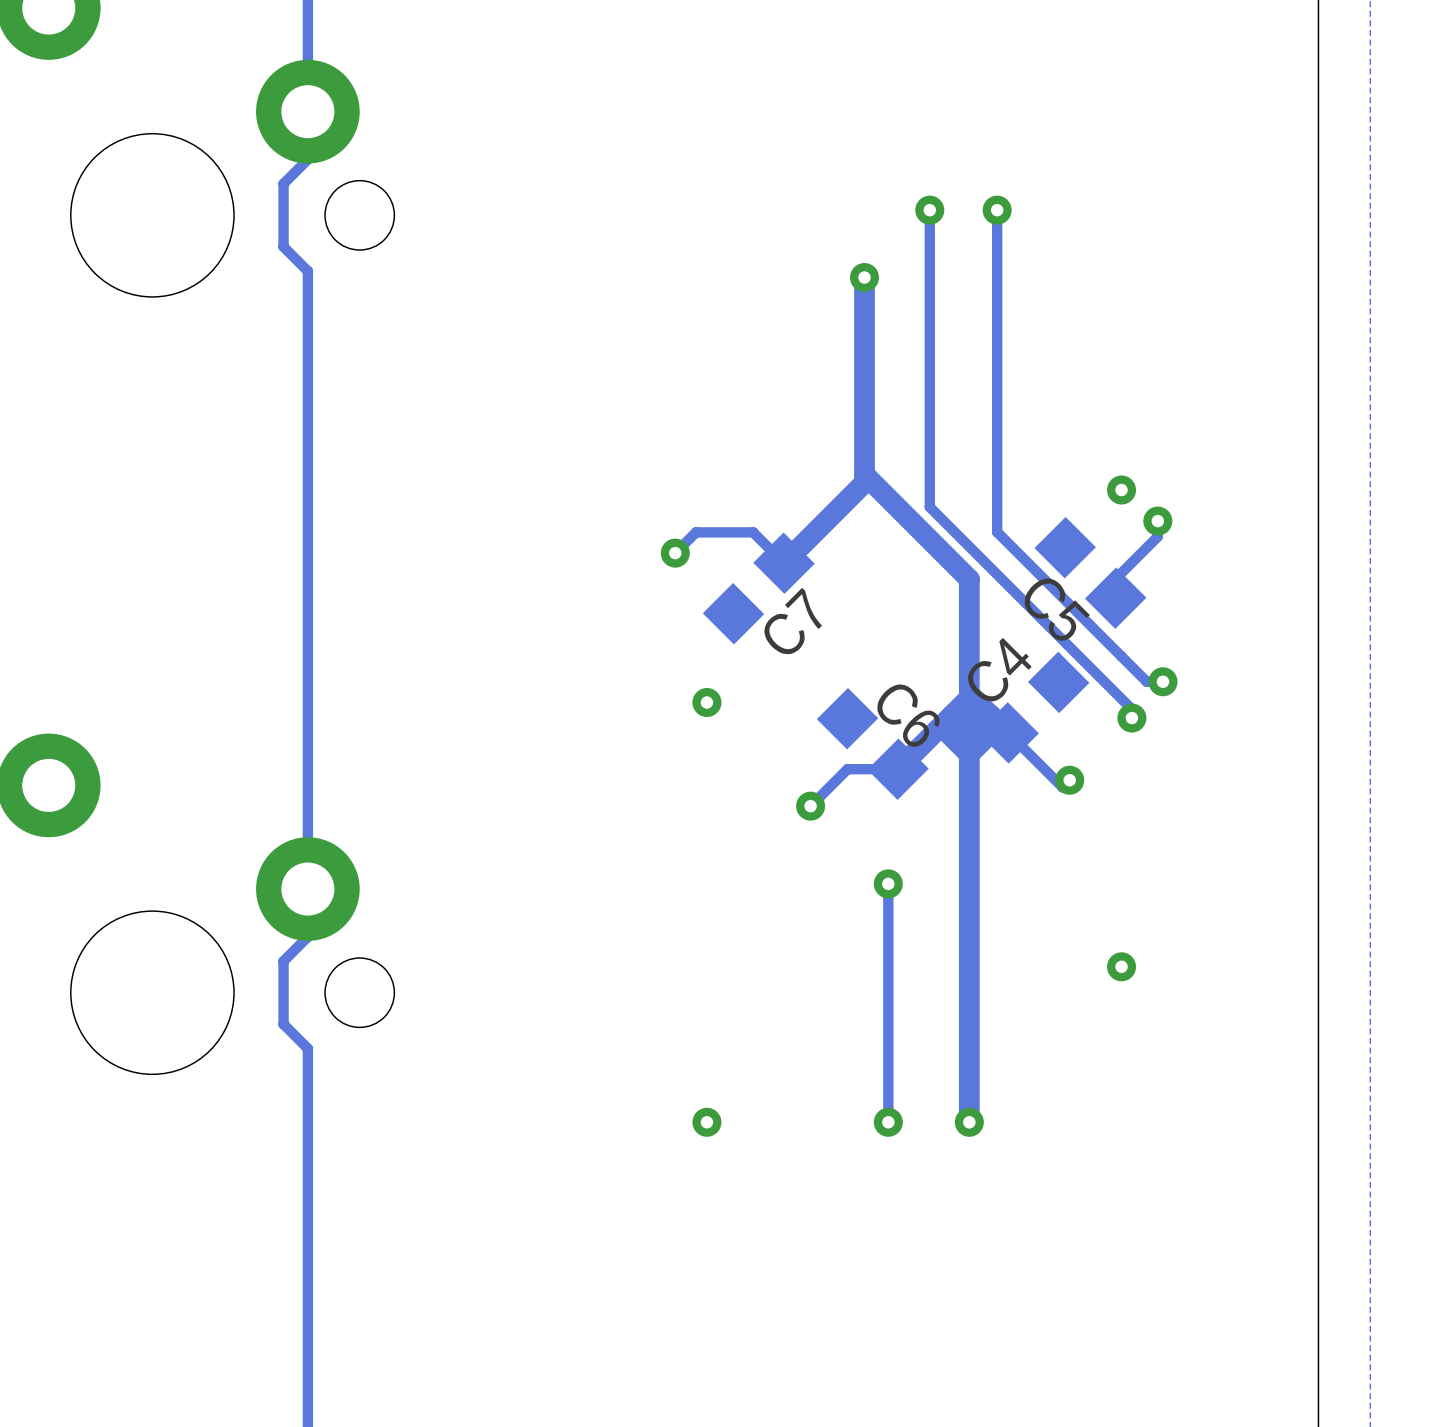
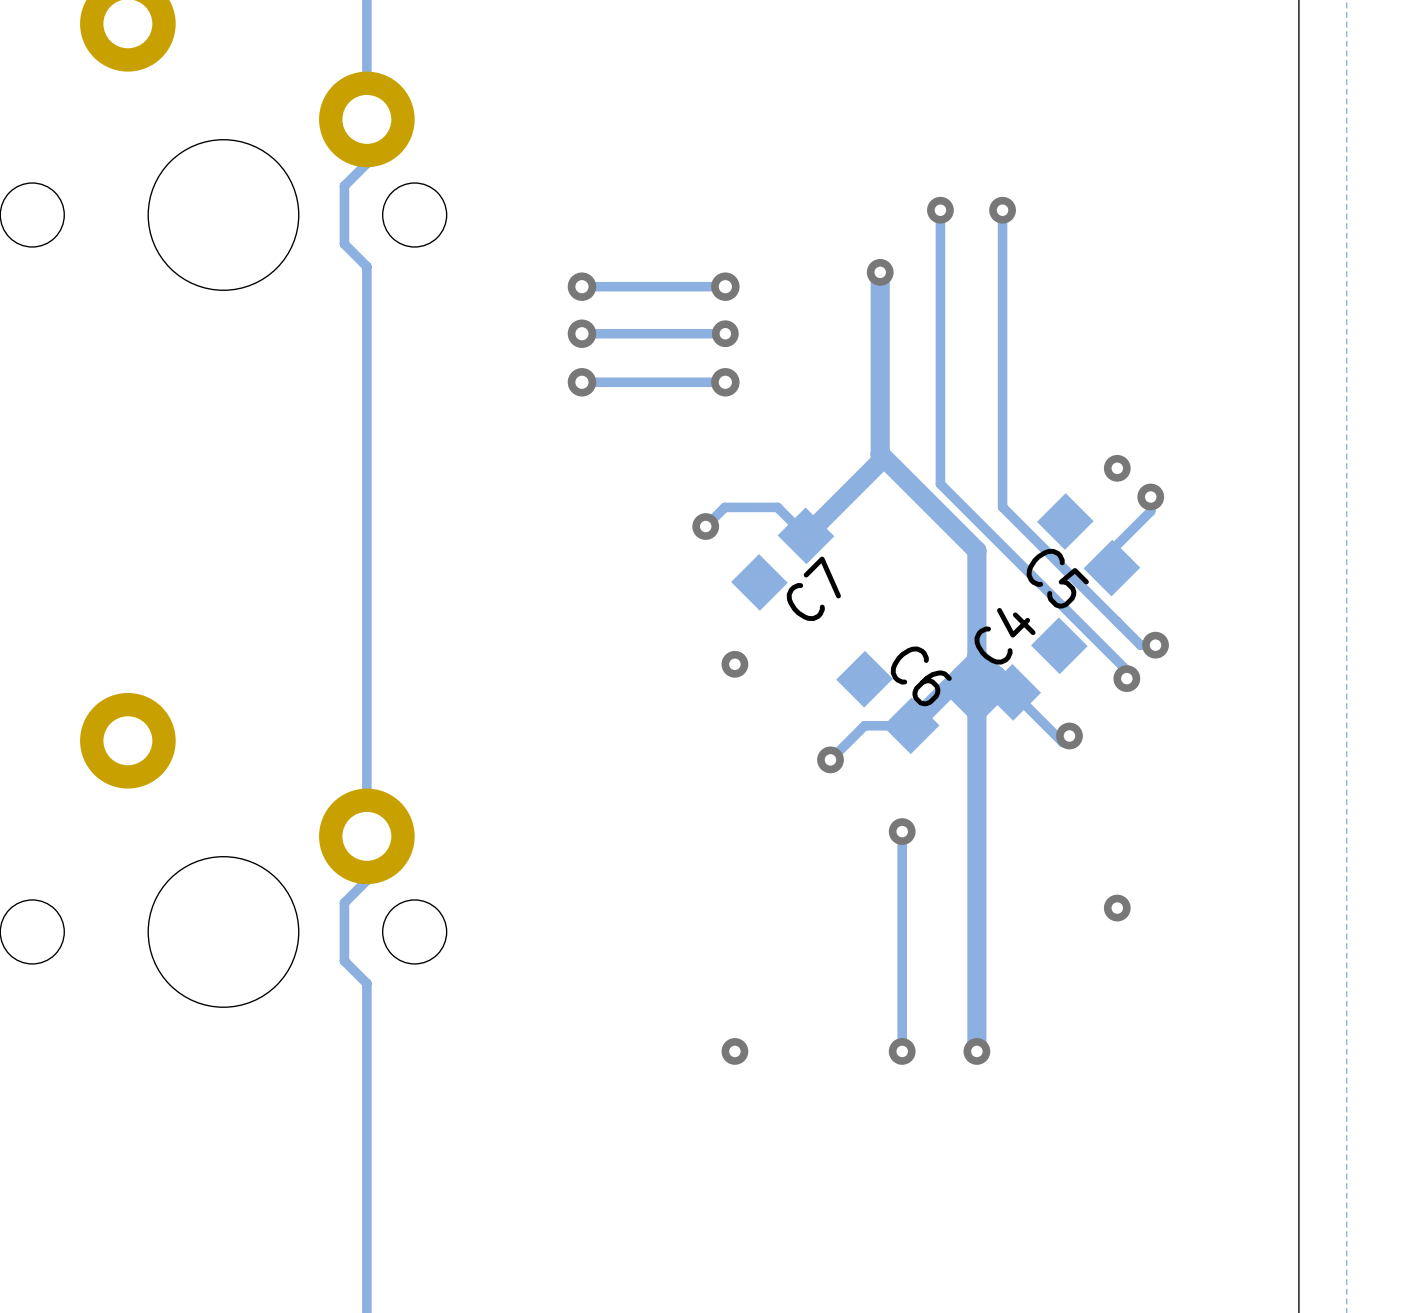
via: none -> (581, 286)
track: none -> (725, 286) (581, 286)
via: none -> (725, 286)
via: none -> (581, 333)
track: none -> (725, 333) (581, 333)
via: none -> (725, 333)
via: none -> (581, 382)
track: none -> (725, 382) (581, 382)
via: none -> (725, 382)

